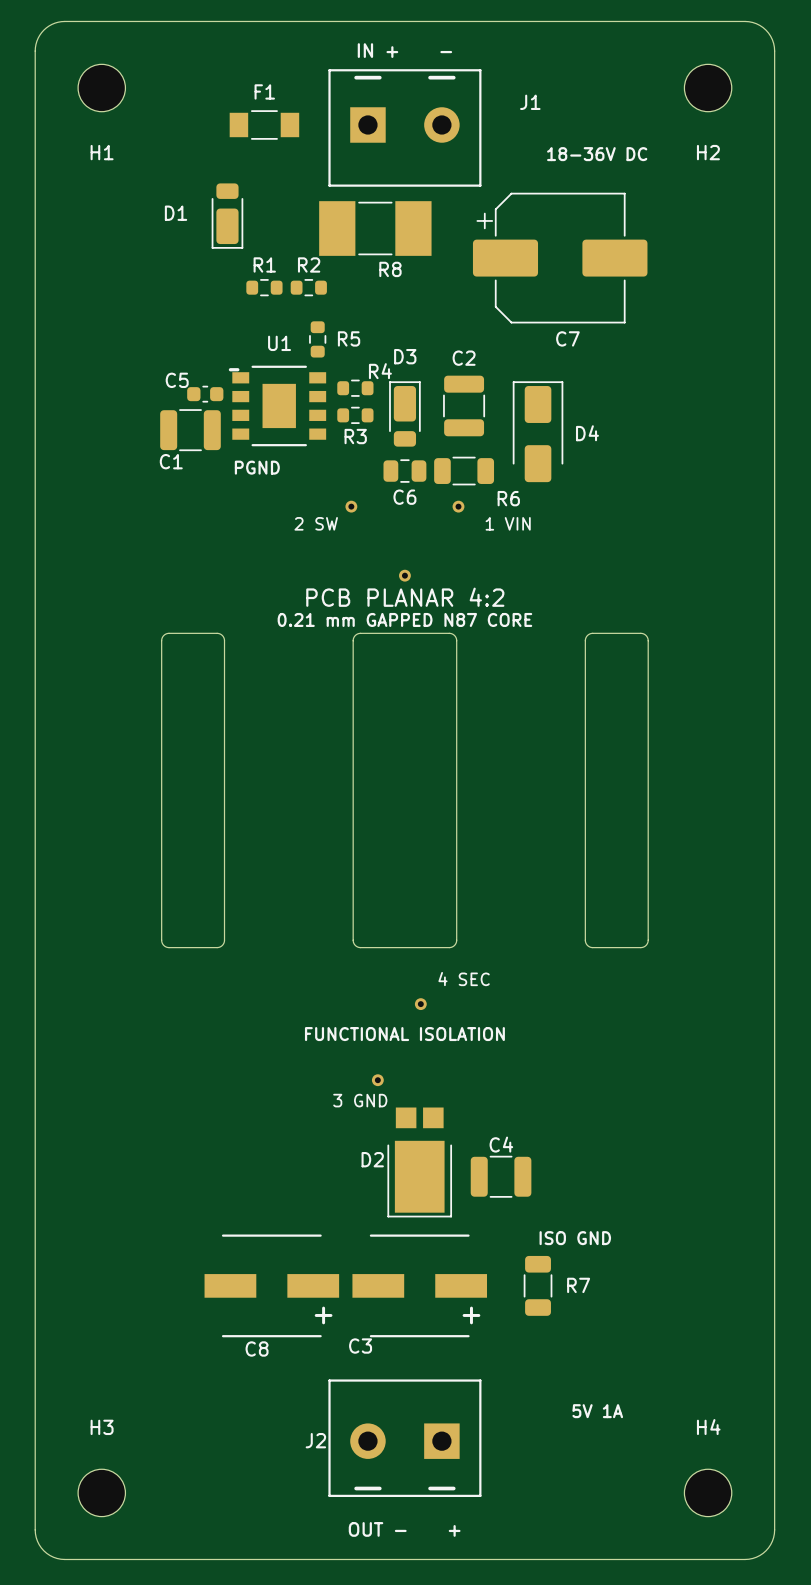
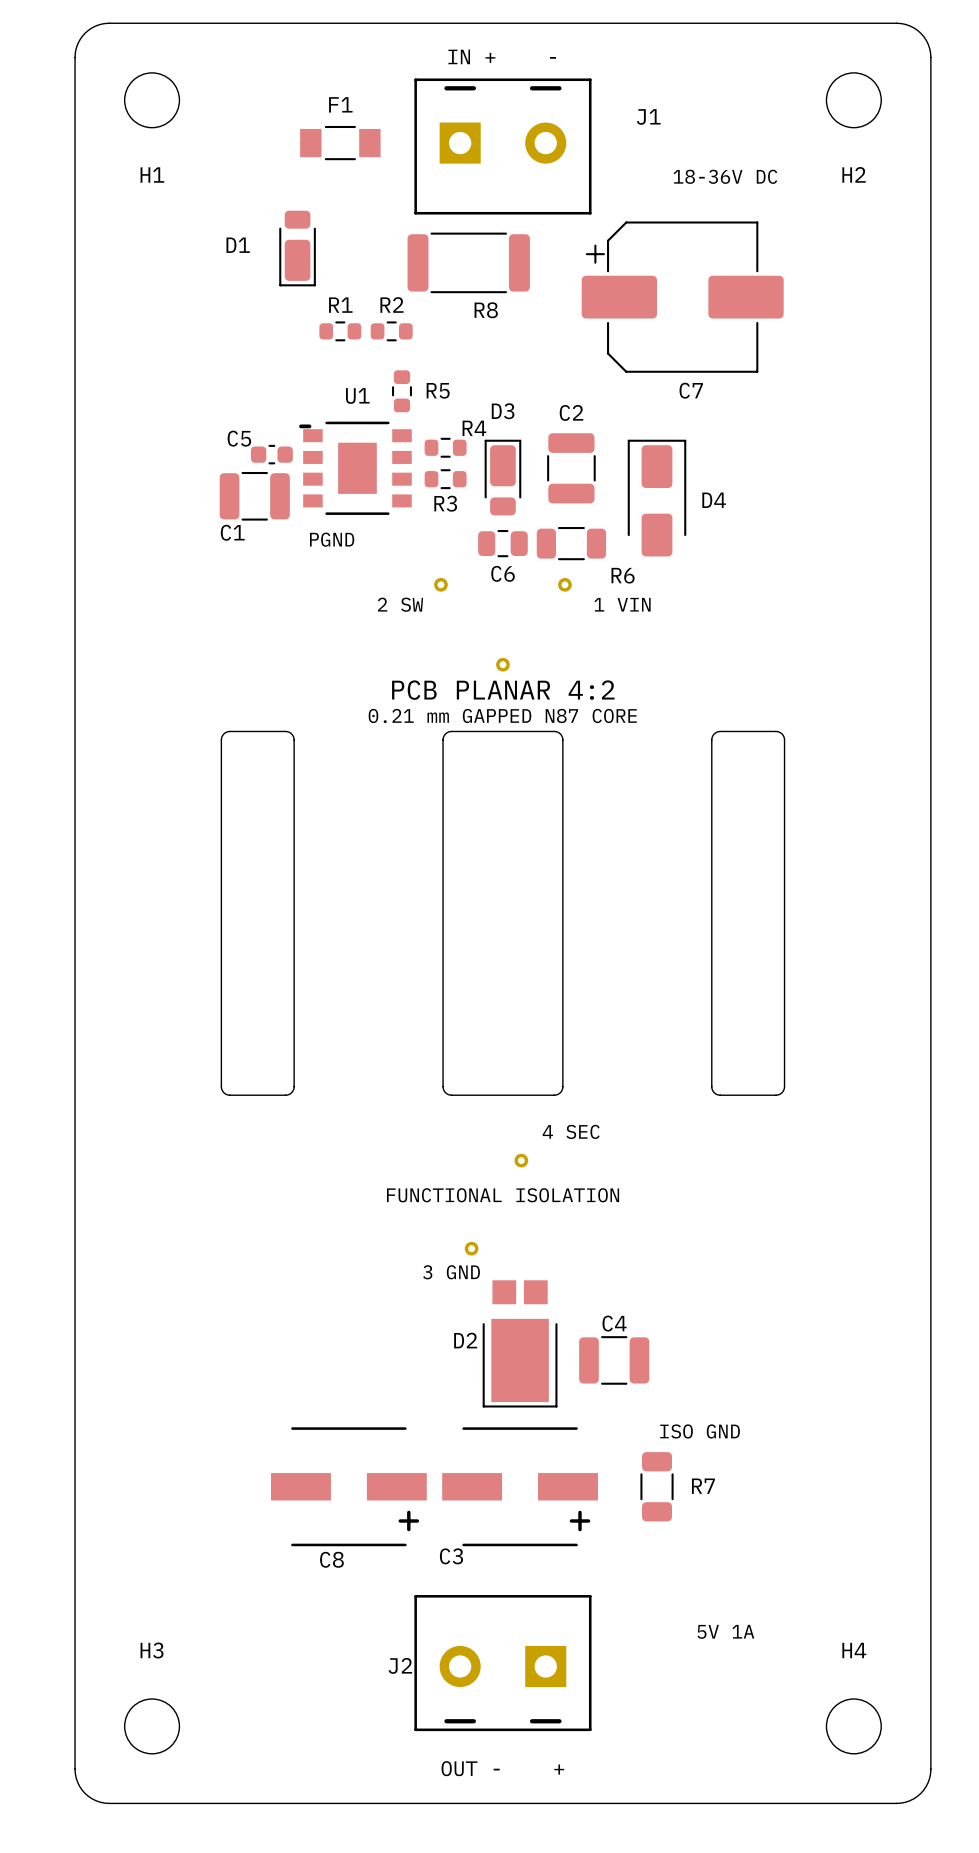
R8 footprint: [319, 201, 432, 256] -> [407, 232, 530, 294]

